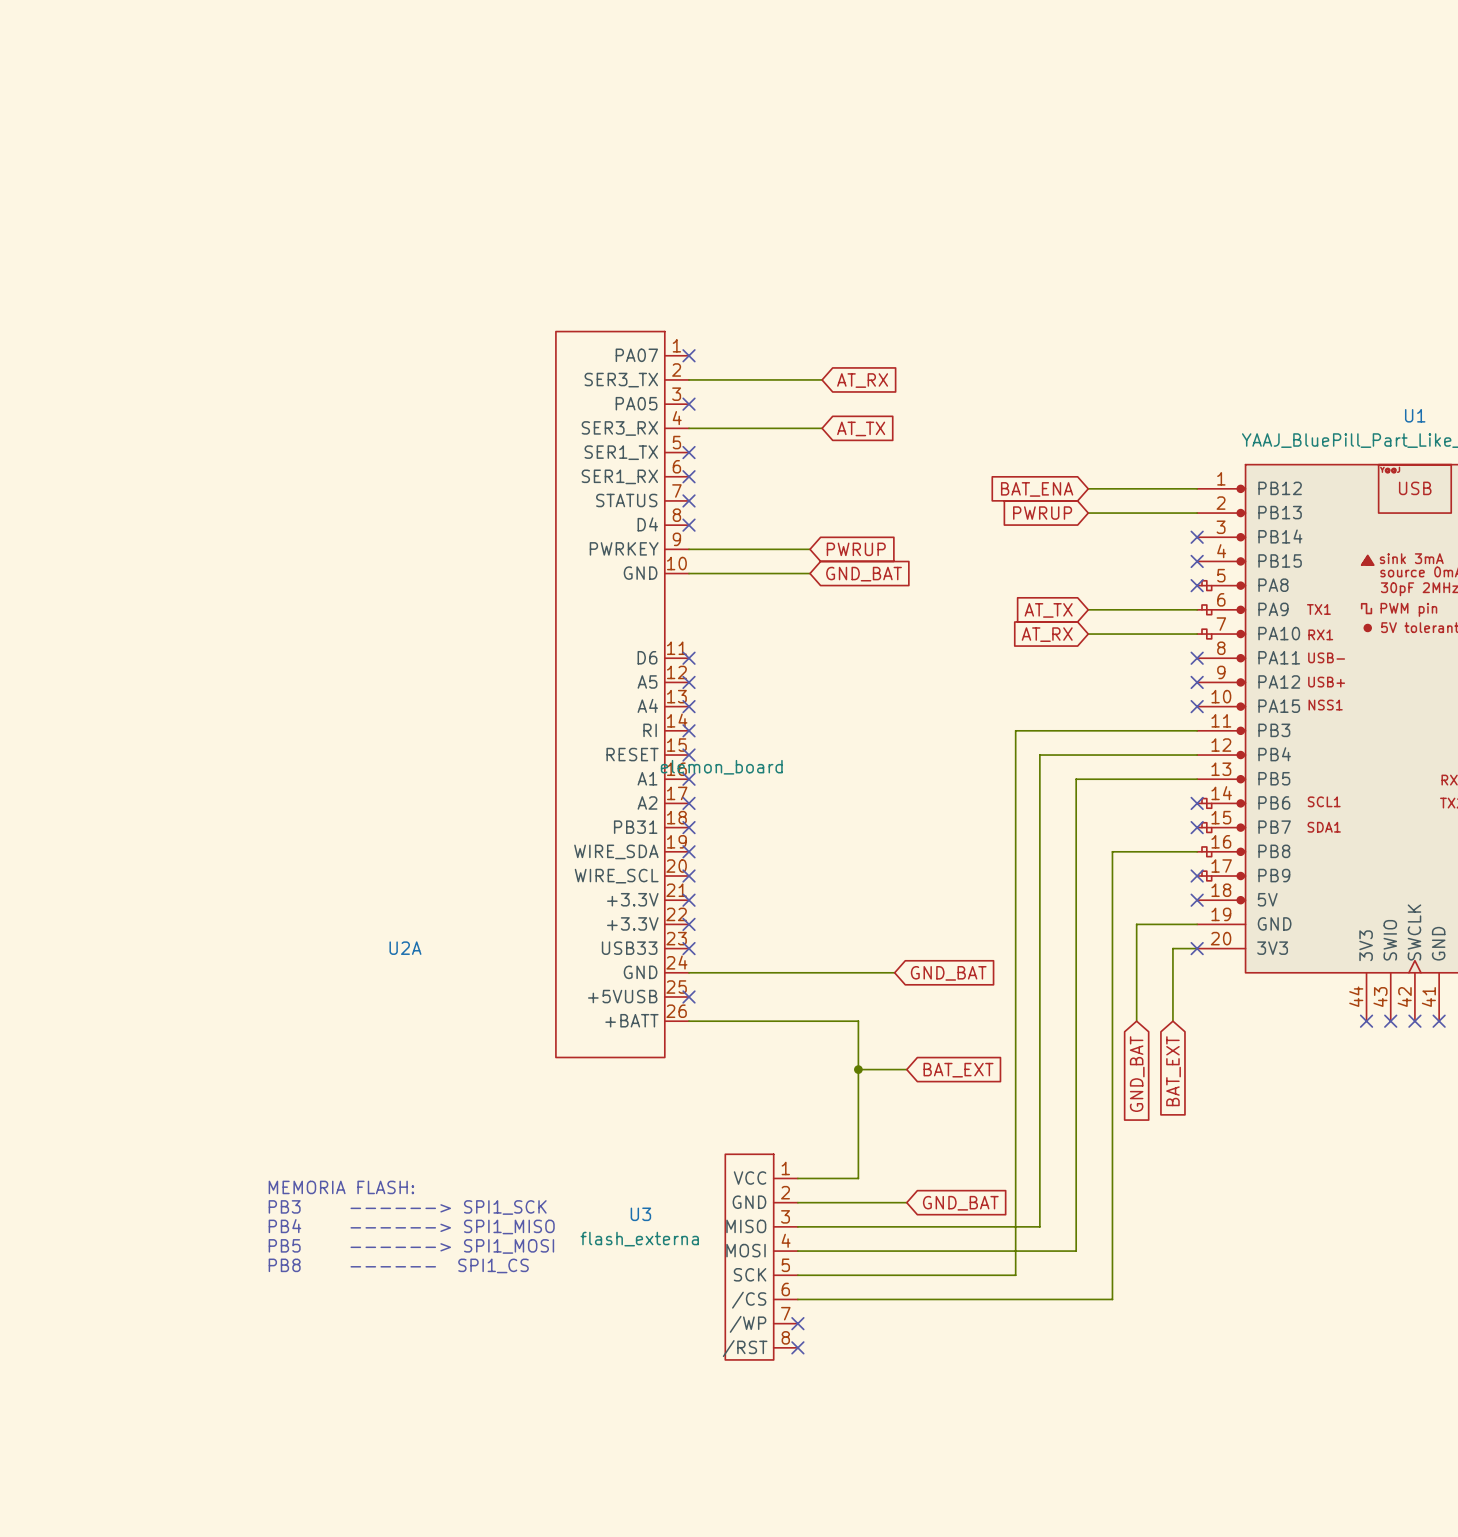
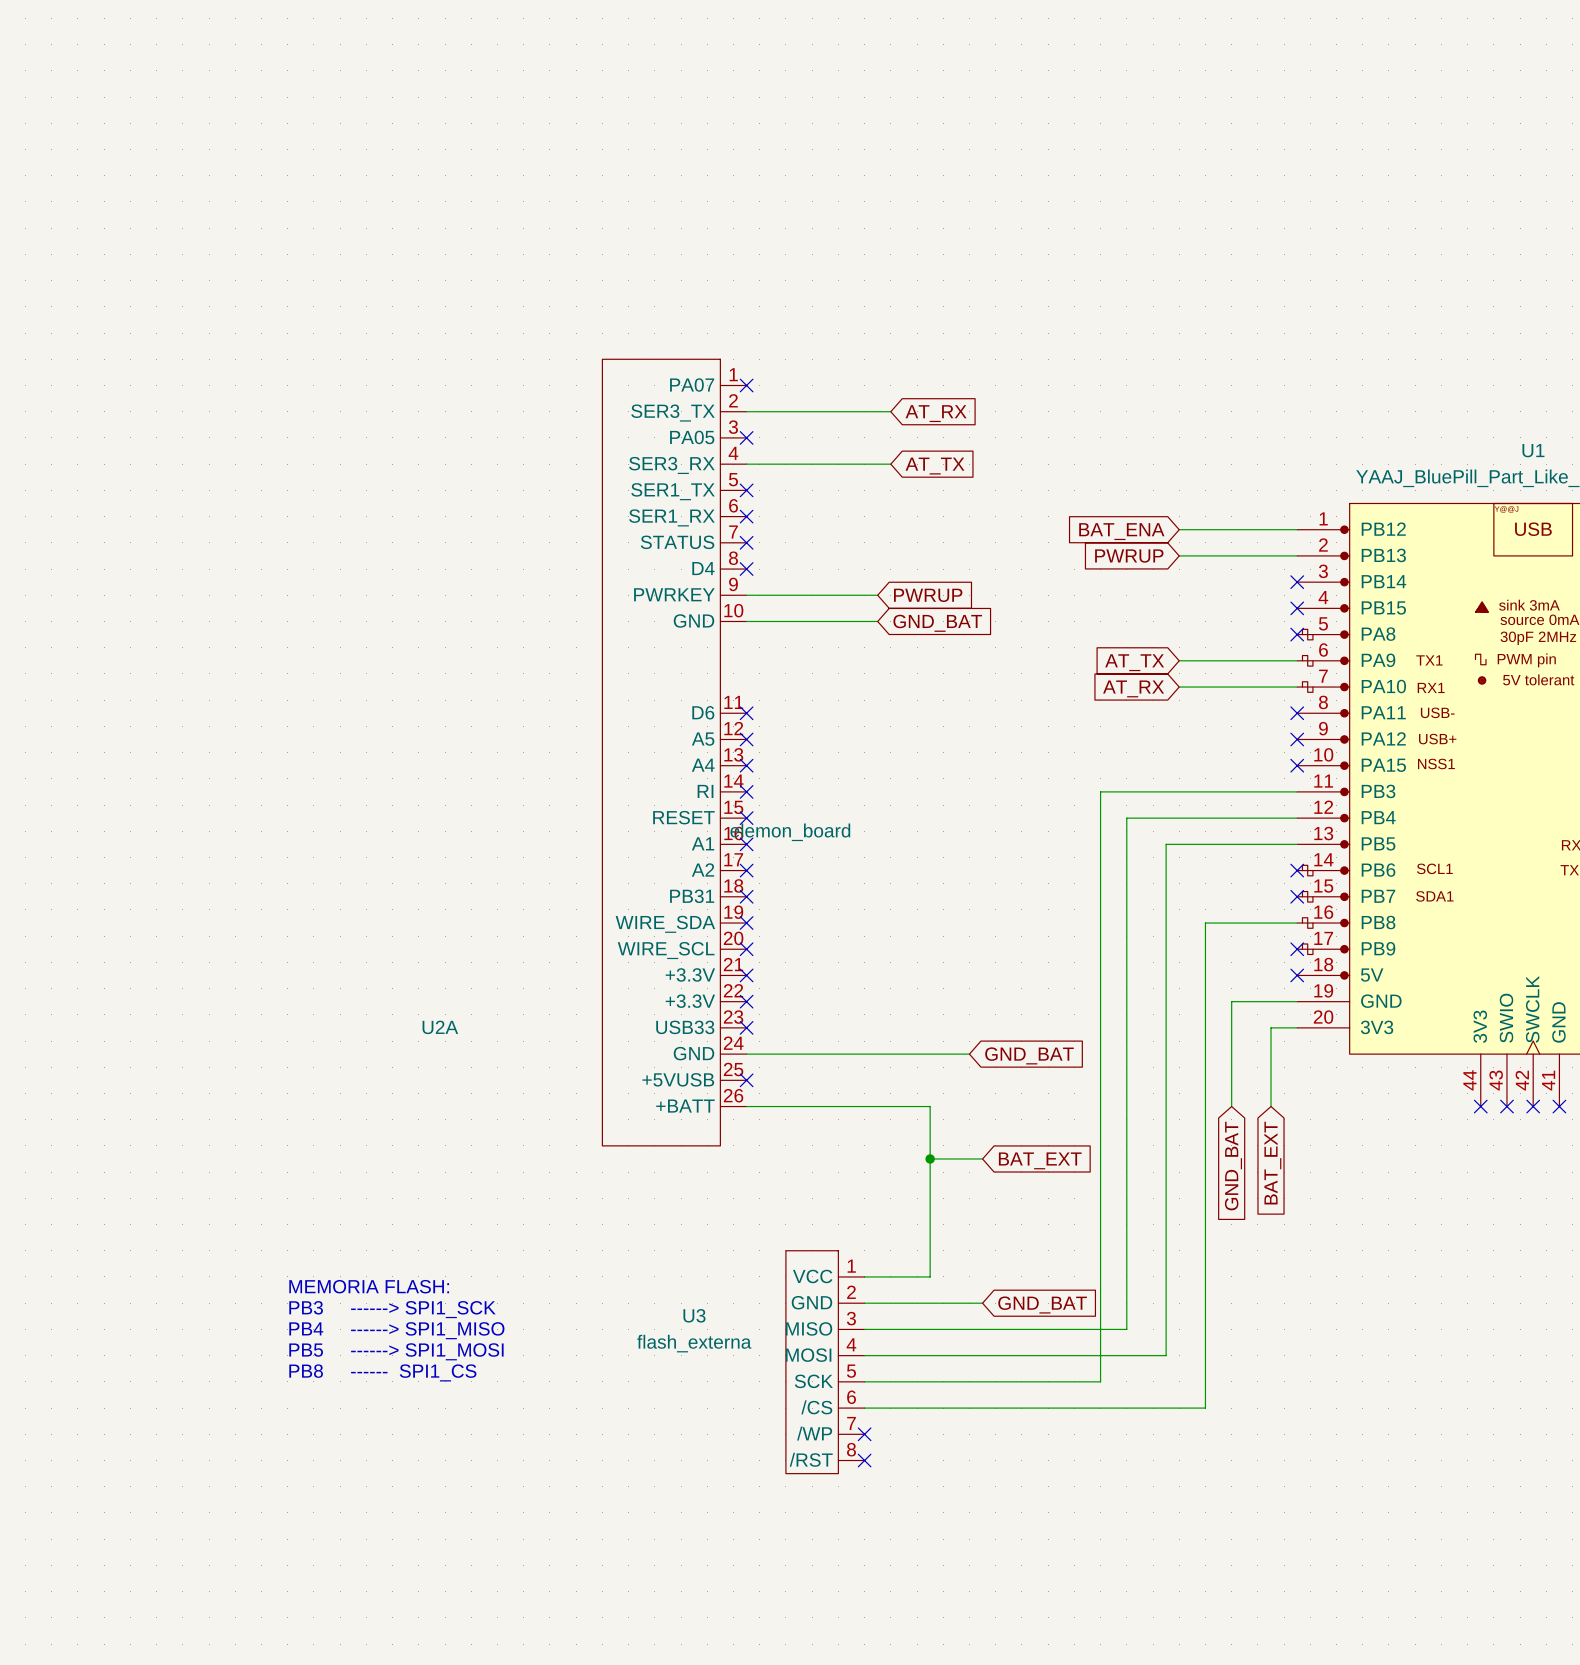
no-connect mark: (1197, 948) -> none

